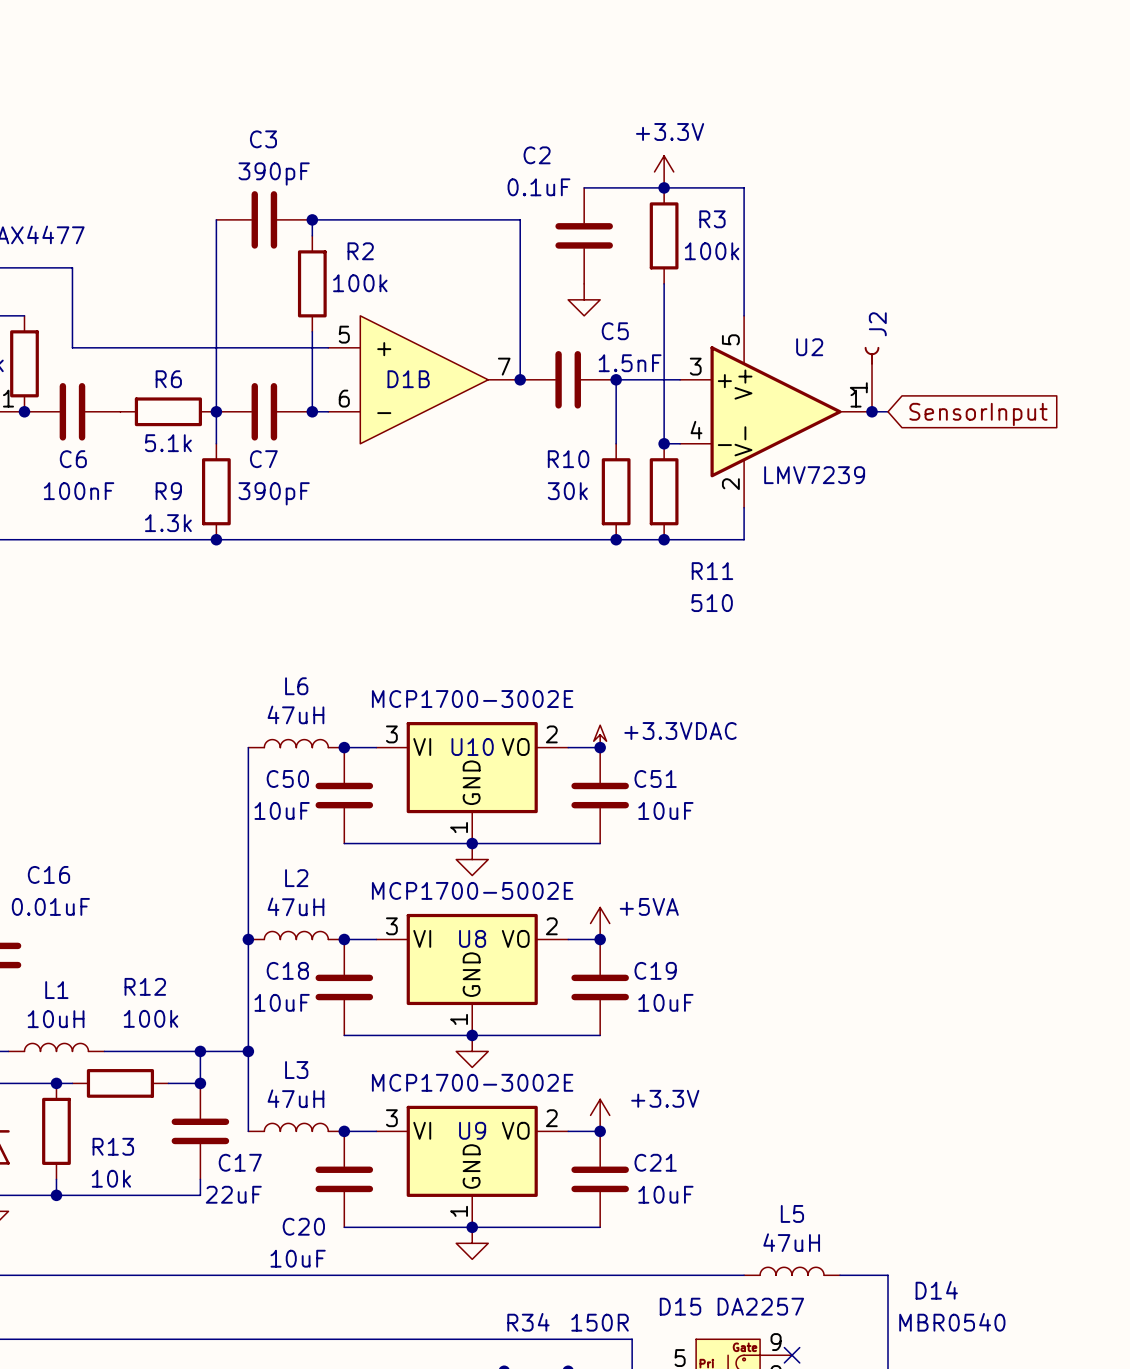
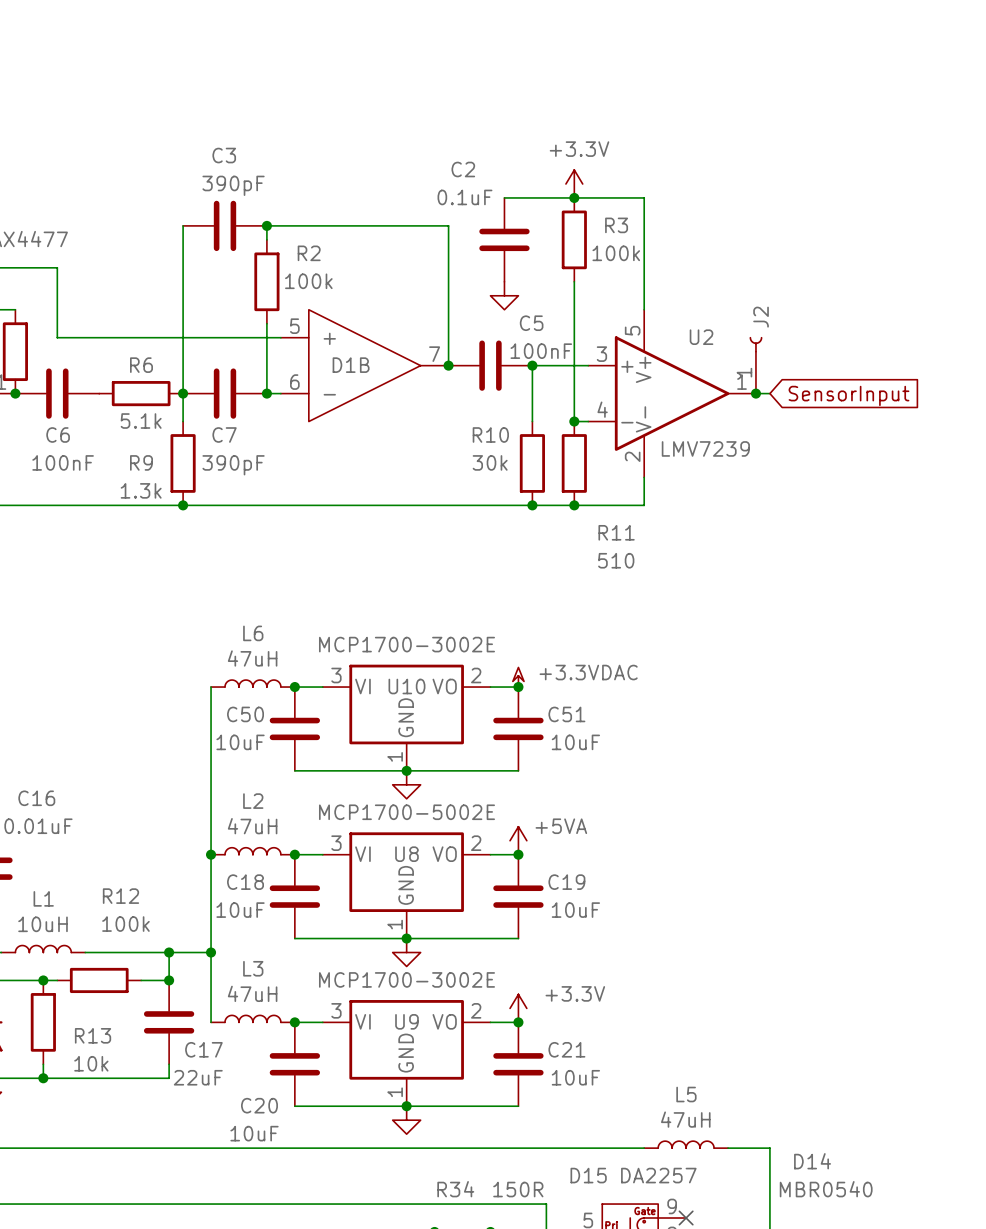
C5 value: 1.5nF (630, 363) -> 100nF (541, 351)

